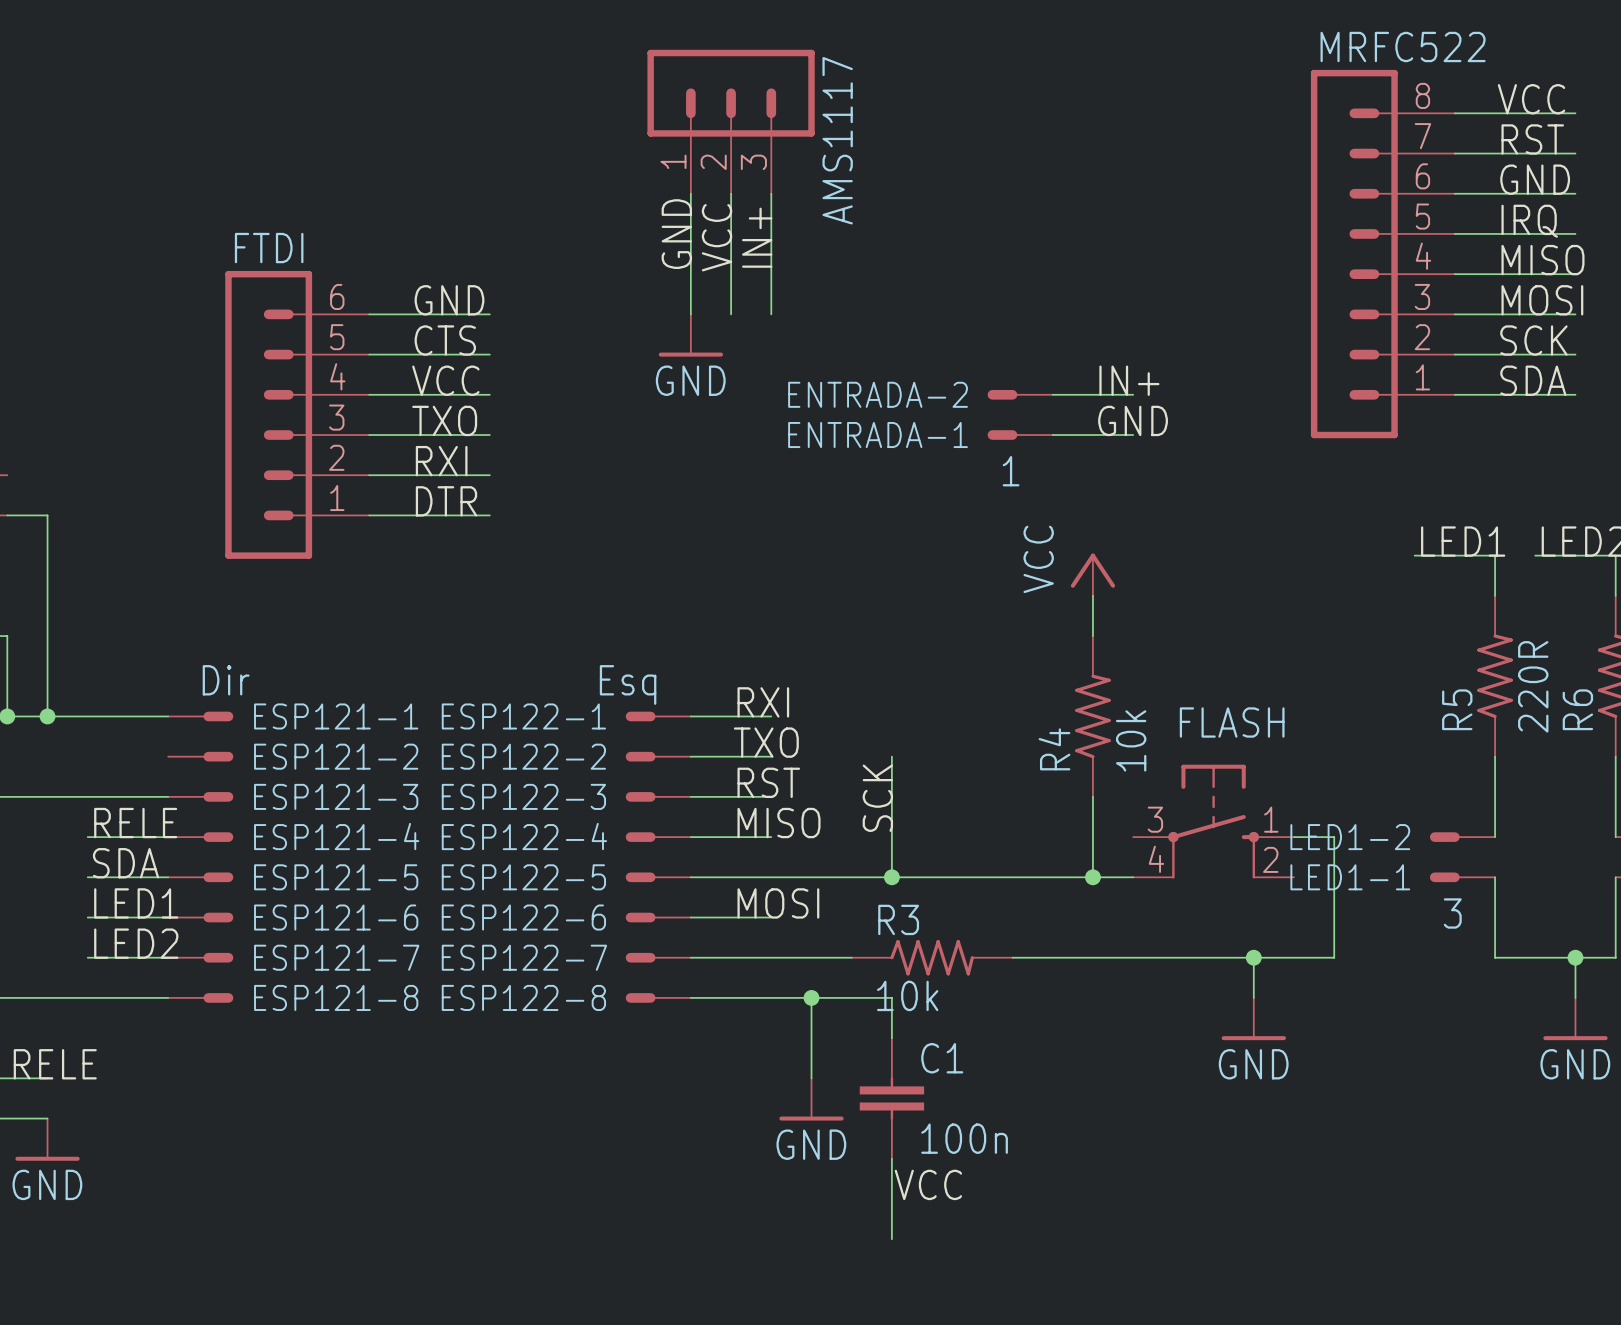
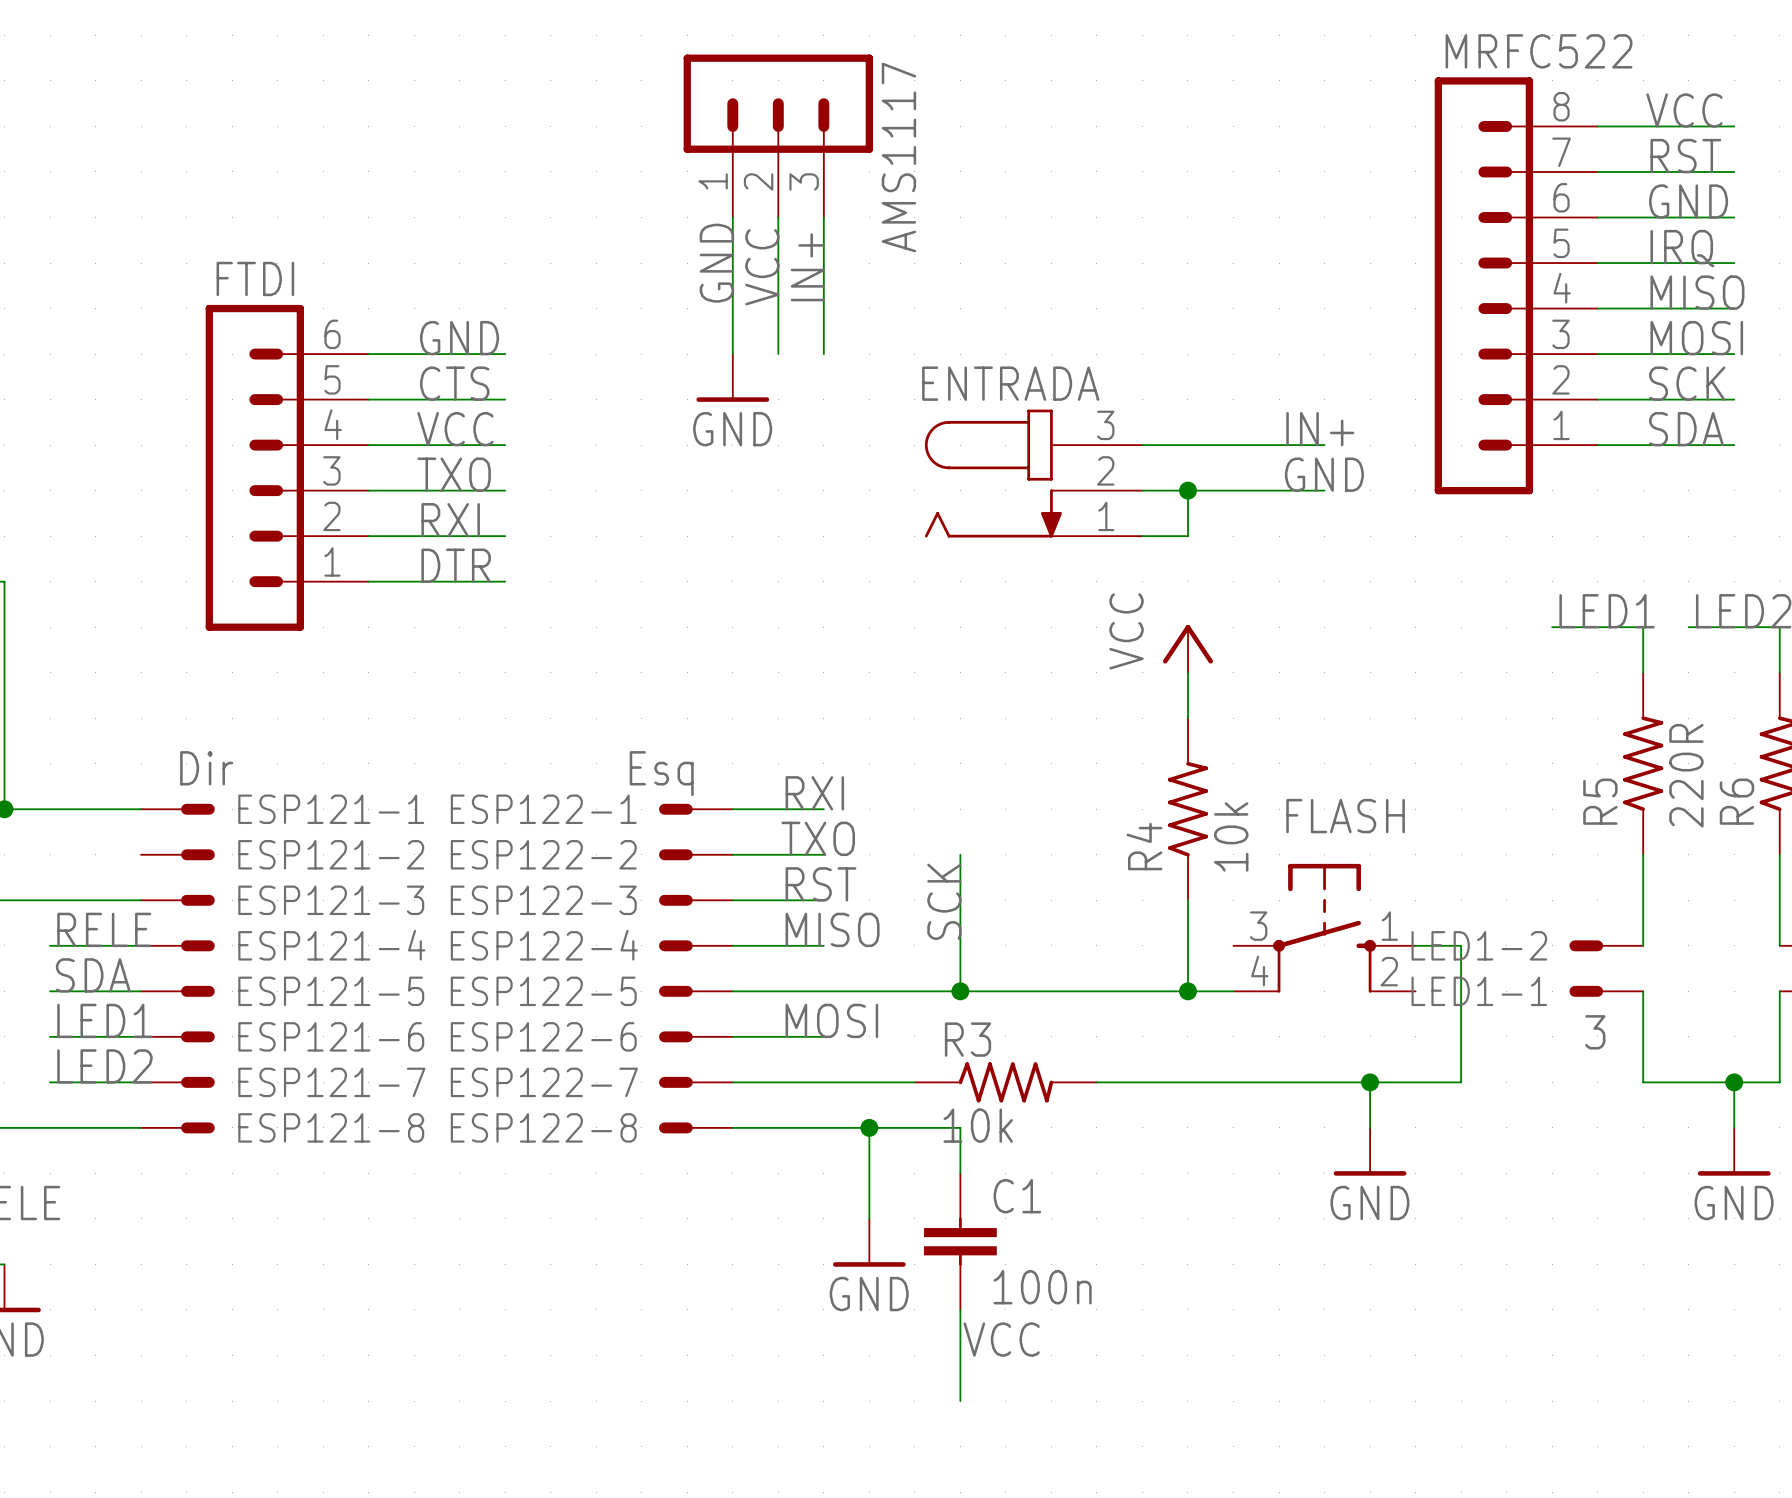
label position: IN+ (1129, 380) -> IN+ (1320, 429)
ENTRADA-2: (1020, 394) -> none
wire: none -> (1233, 445) (1324, 445)
ENTRADA: none -> (1033, 473)
label position: GND (1133, 420) -> GND (1324, 474)
ENTRADA-1: 1 (1020, 435) -> none
wire: none -> (1187, 490) (1187, 536) (1142, 536)
junction: none -> (1187, 490)
wire: none -> (1233, 490) (1324, 490)

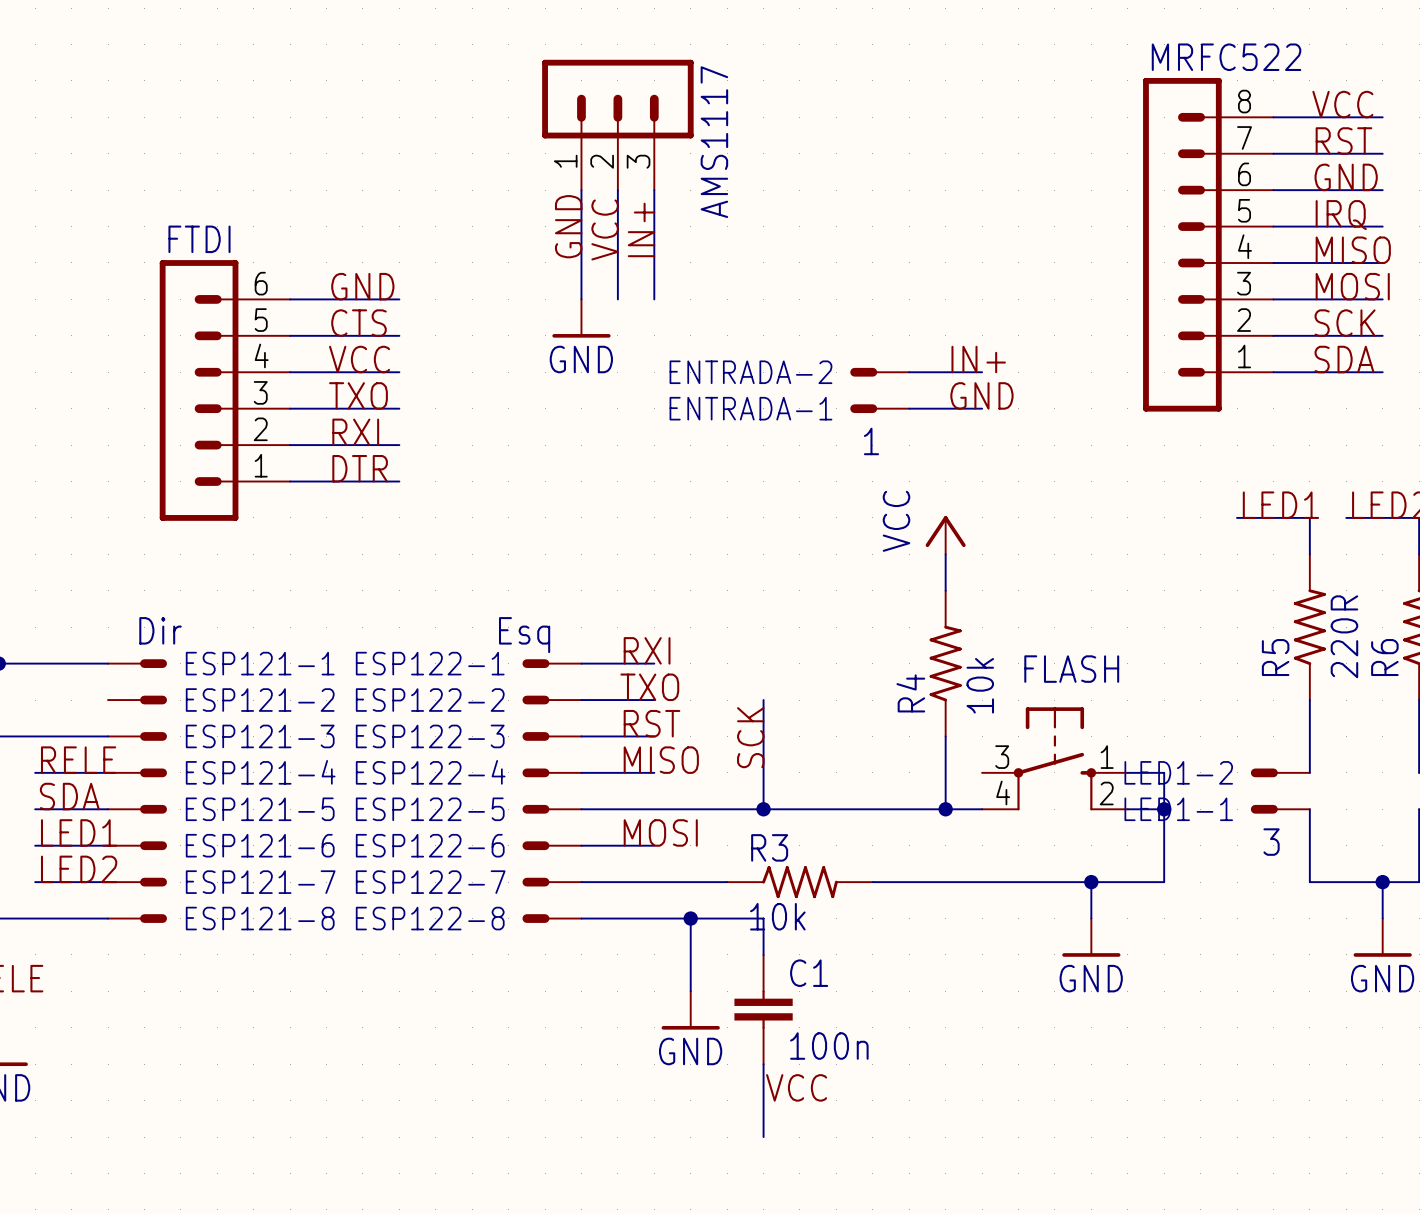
label position: IN+ (1320, 429) -> IN+ (978, 359)
ENTRADA-2: none -> (879, 372)
wire: (1233, 445) (1324, 445) -> none
ENTRADA: (1033, 473) -> none
label position: GND (1324, 474) -> GND (981, 395)
ENTRADA-1: none -> 1 (879, 408)
wire: (1187, 490) (1187, 536) (1142, 536) -> none
junction: (1187, 490) -> none
wire: (1233, 490) (1324, 490) -> none
wire: none -> (1127, 809) (1164, 809)
junction: none -> (1164, 809)

